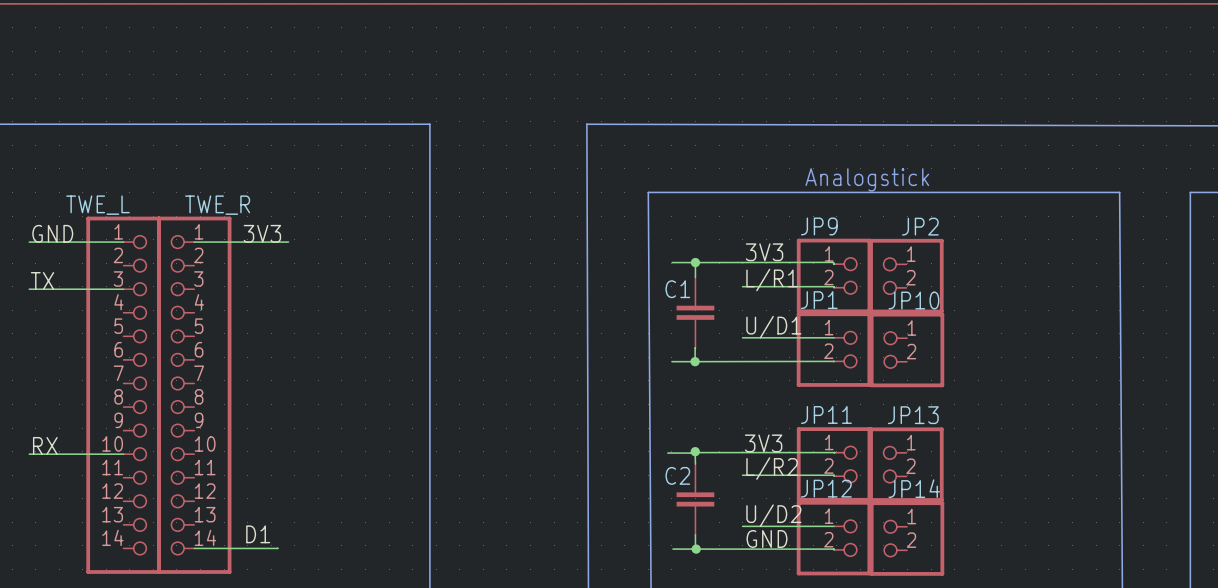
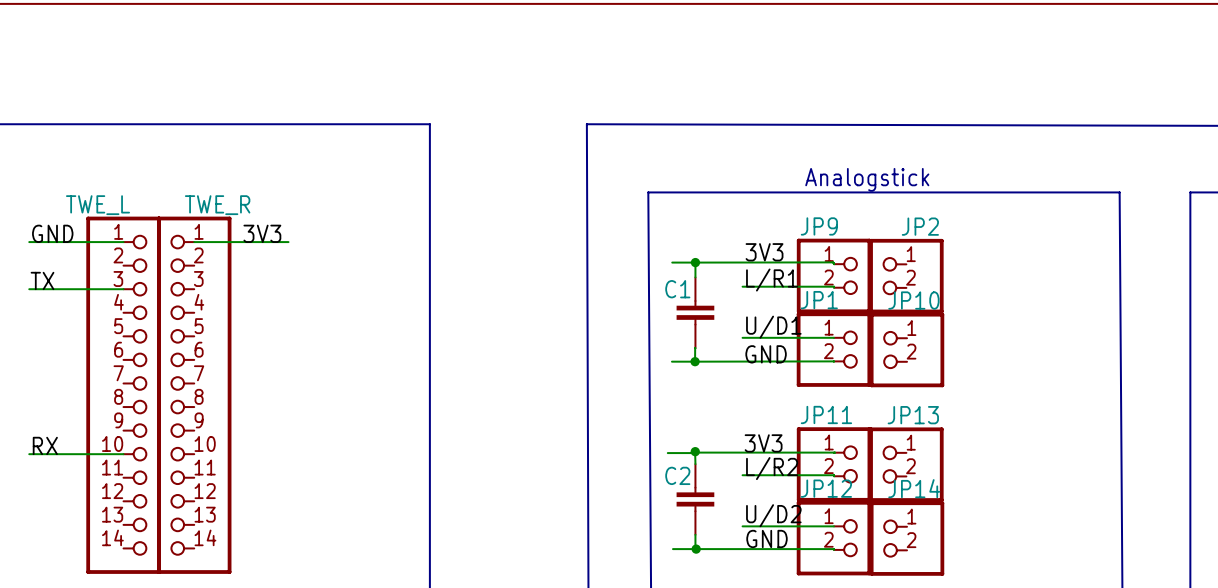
label: none -> GND (766, 354)
label: D1 (258, 534) -> none
wire: (277, 548) (194, 548) -> none

